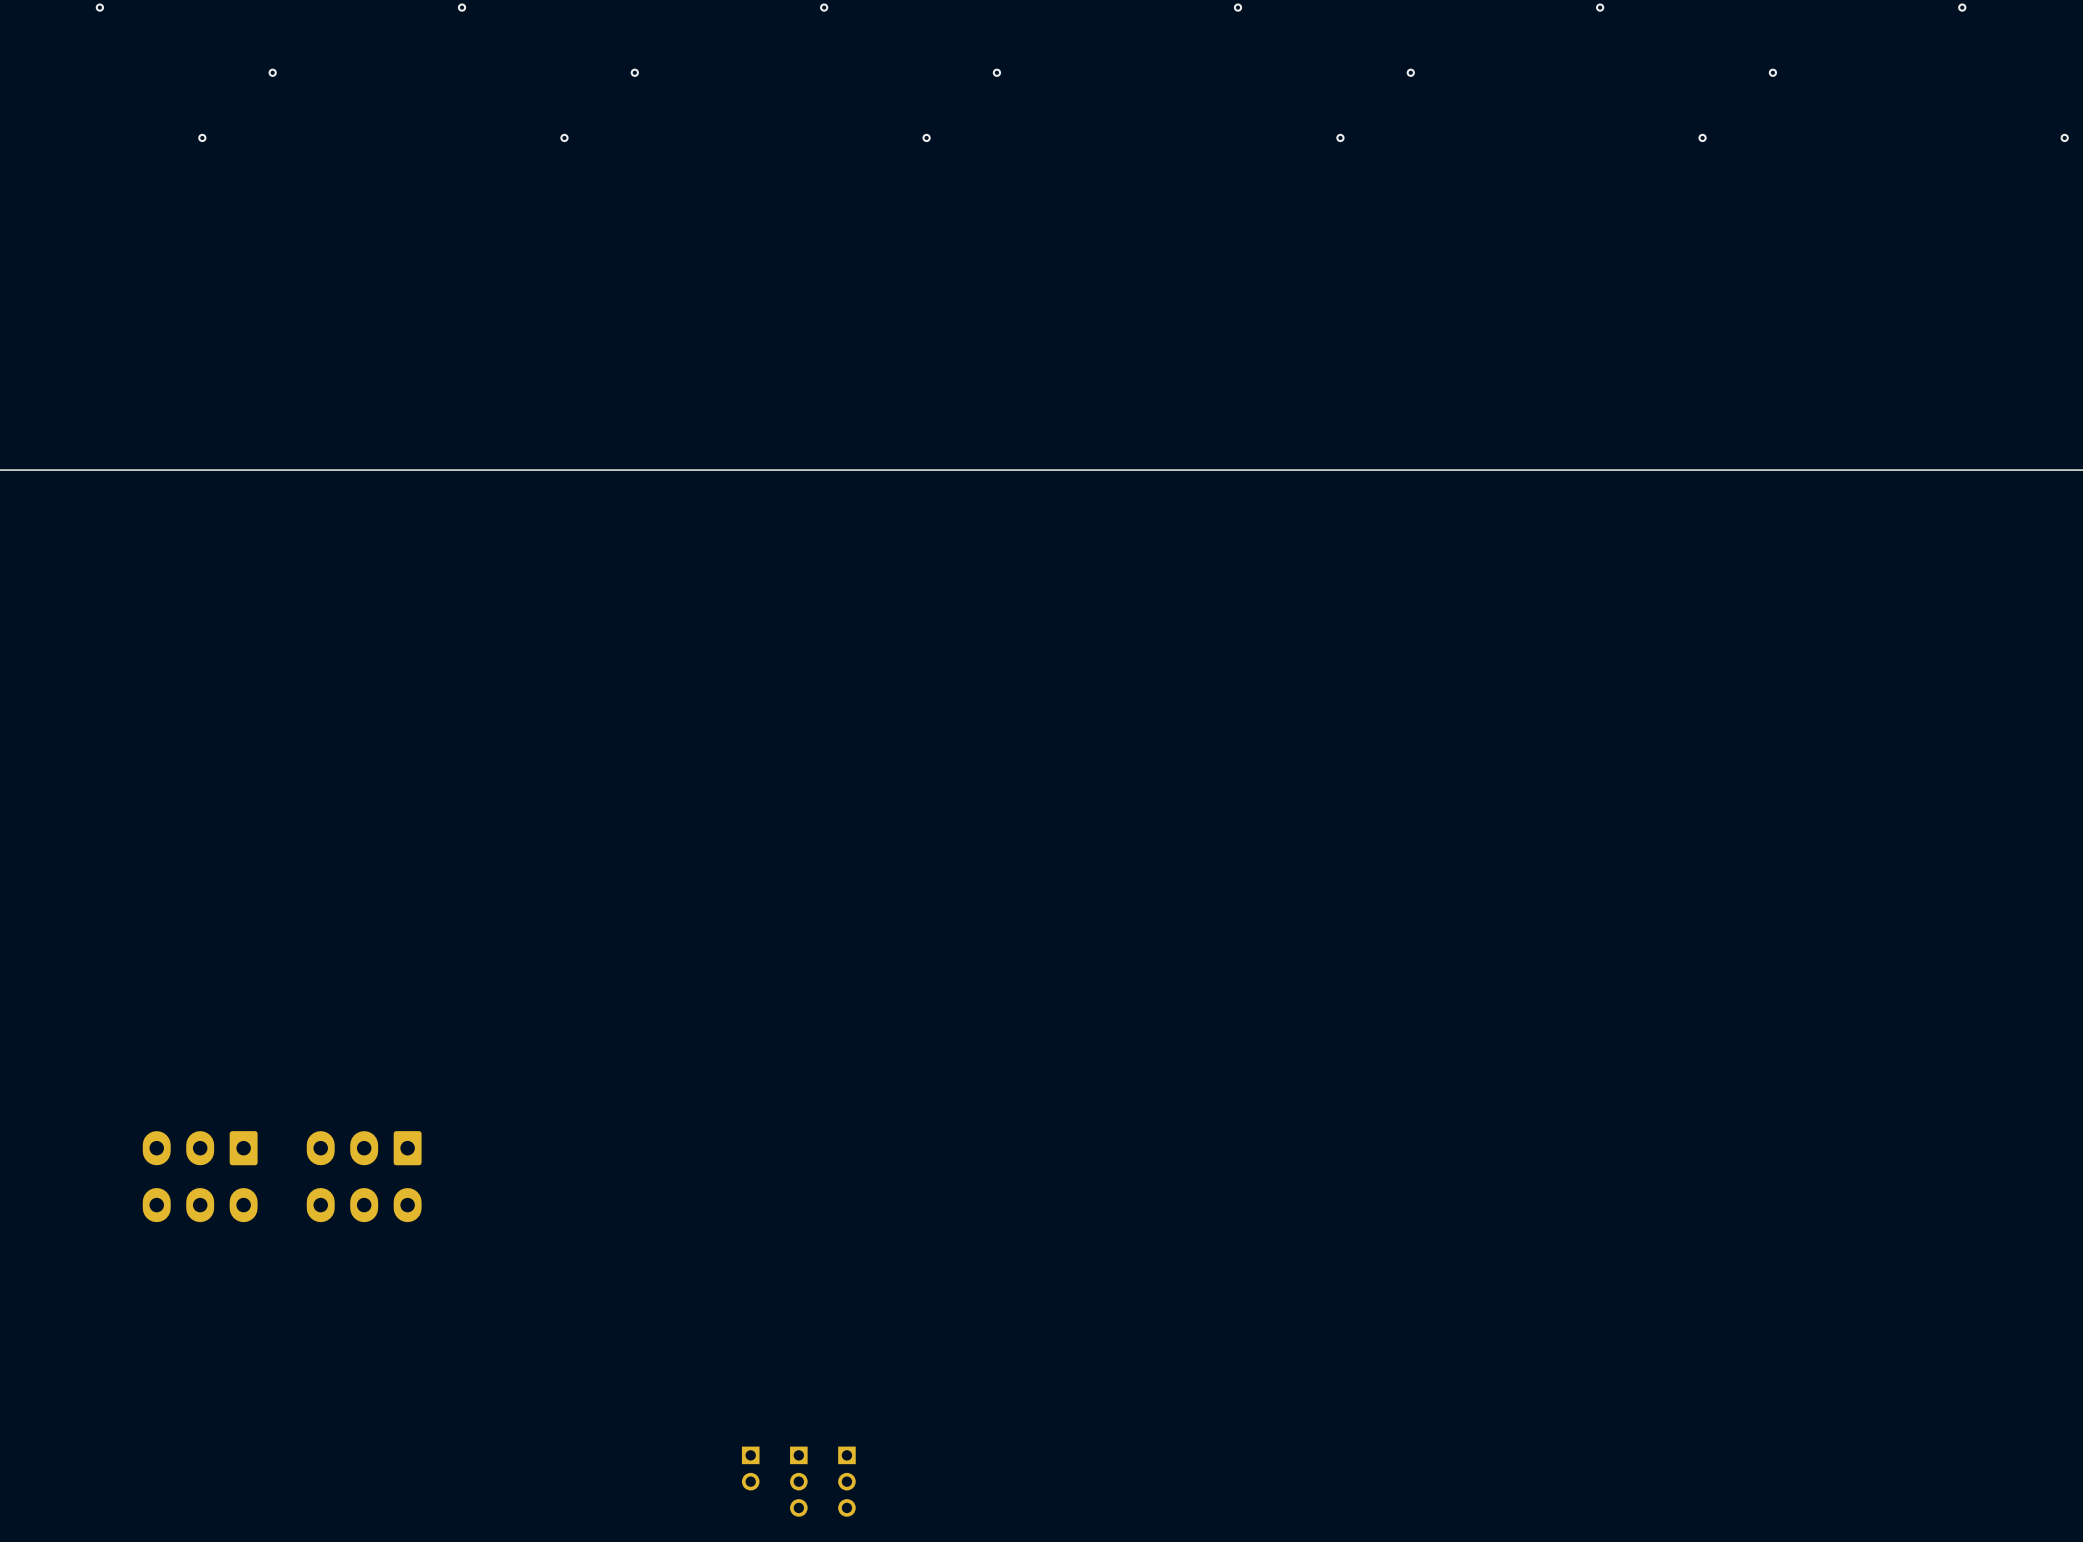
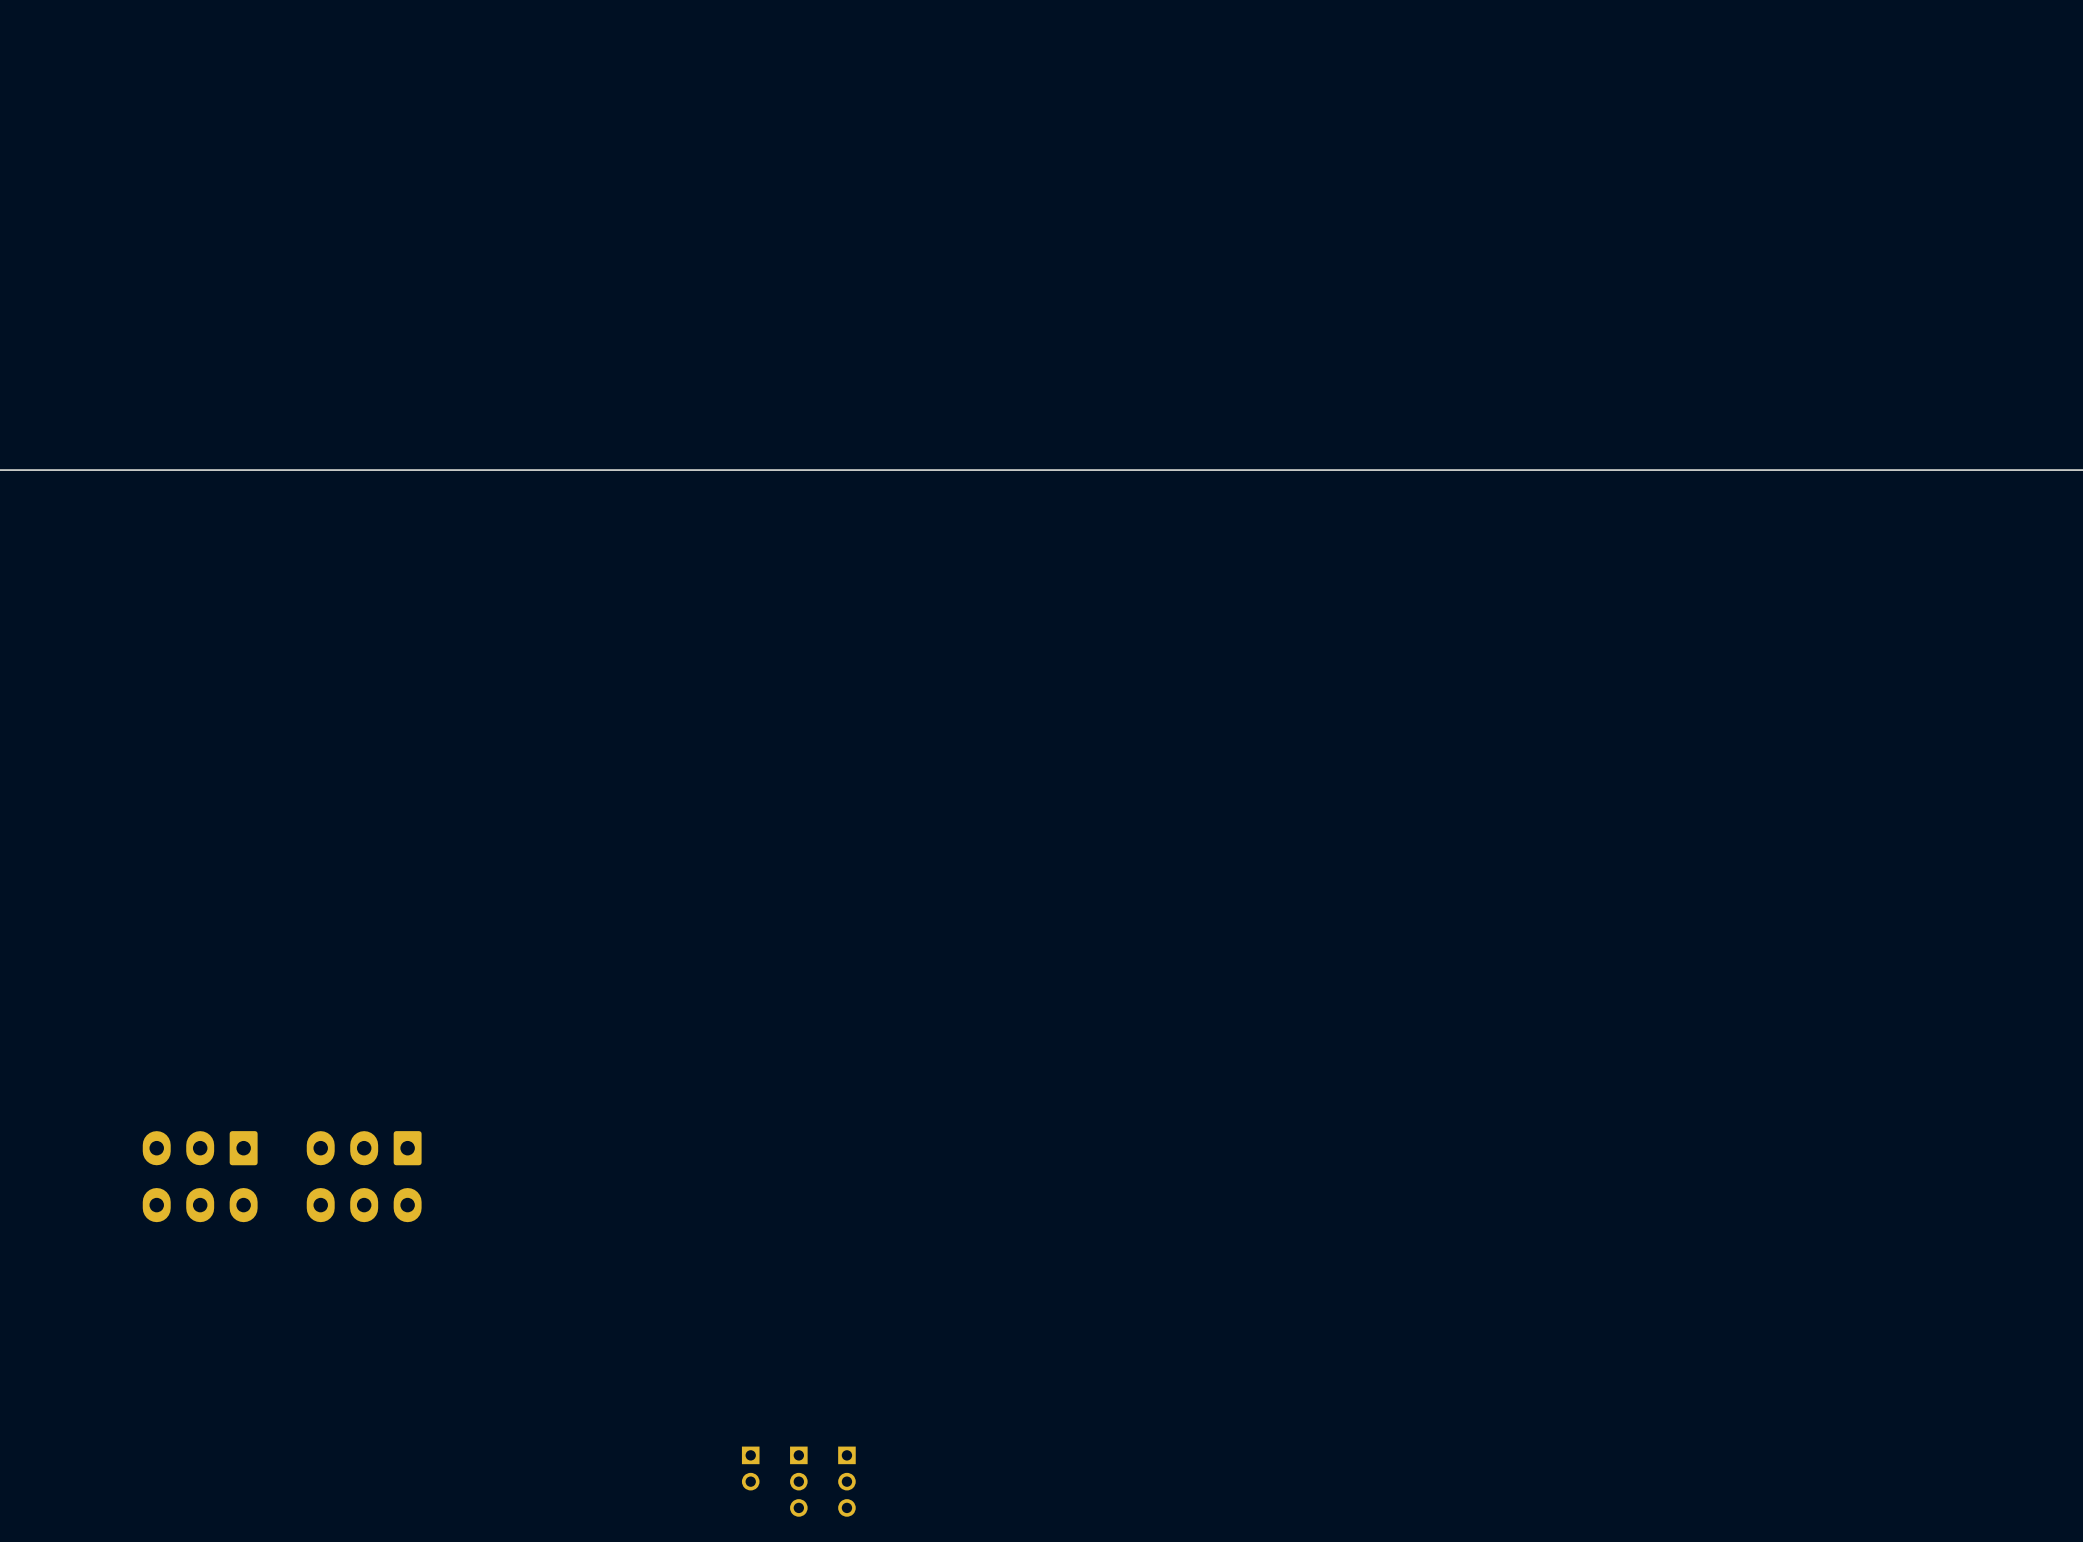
via: (99, 7) -> none
via: (462, 7) -> none
via: (824, 7) -> none
via: (1238, 7) -> none
via: (1600, 7) -> none
via: (1962, 7) -> none
via: (272, 72) -> none
via: (634, 72) -> none
via: (996, 72) -> none
via: (1410, 72) -> none
via: (1772, 72) -> none
via: (202, 137) -> none
via: (564, 137) -> none
via: (926, 137) -> none
via: (1340, 137) -> none
via: (1702, 137) -> none
via: (2064, 137) -> none

